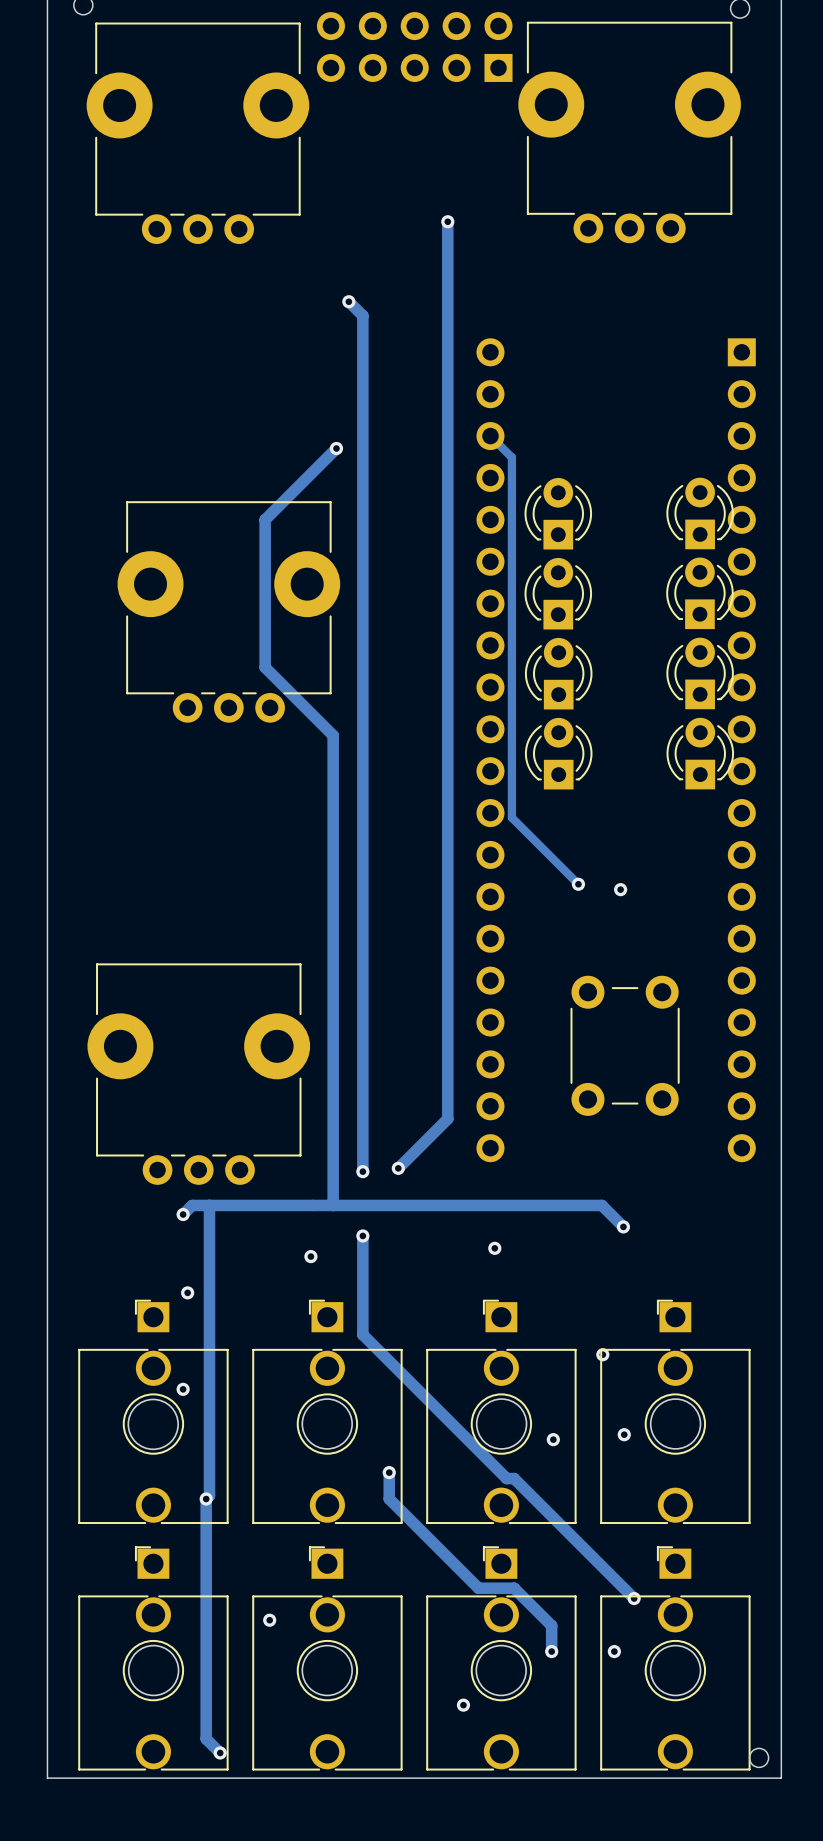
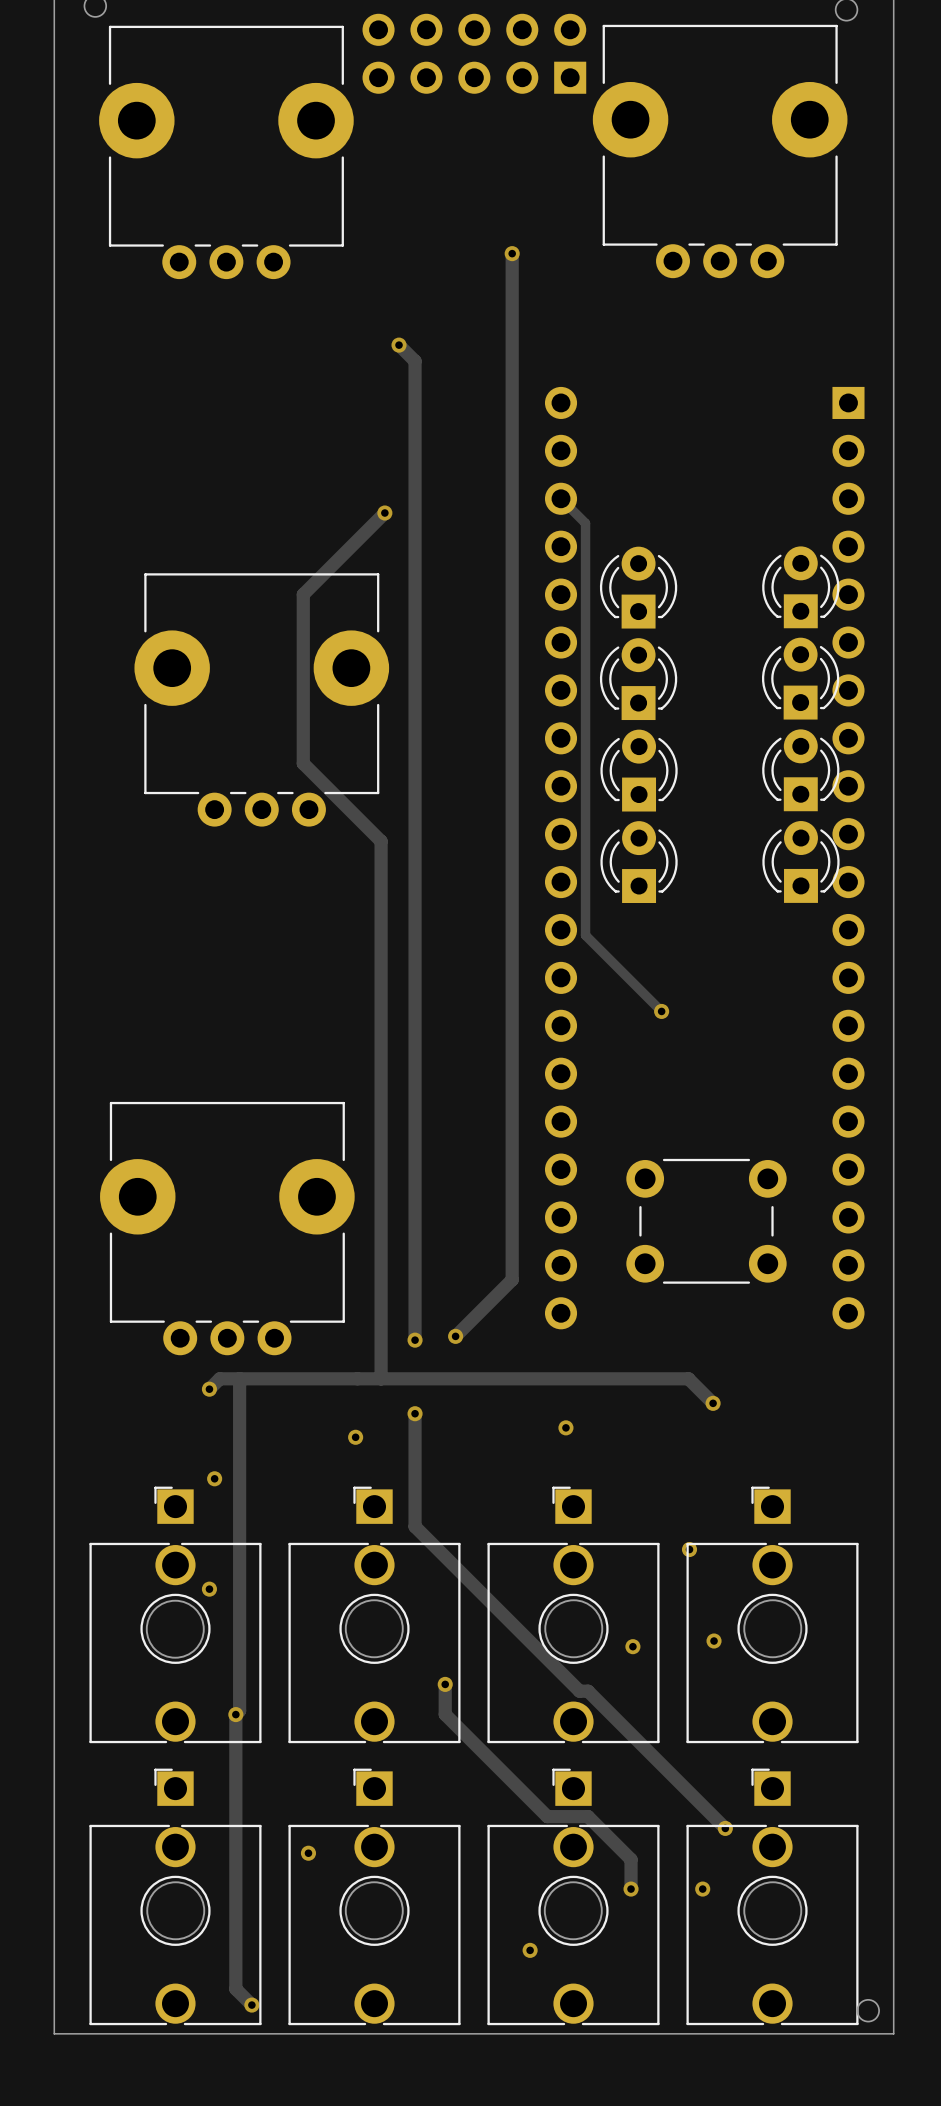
via: (620, 889) -> none
part rotation: 0° (625, 1045) -> 90° clockwise (706, 1221)

